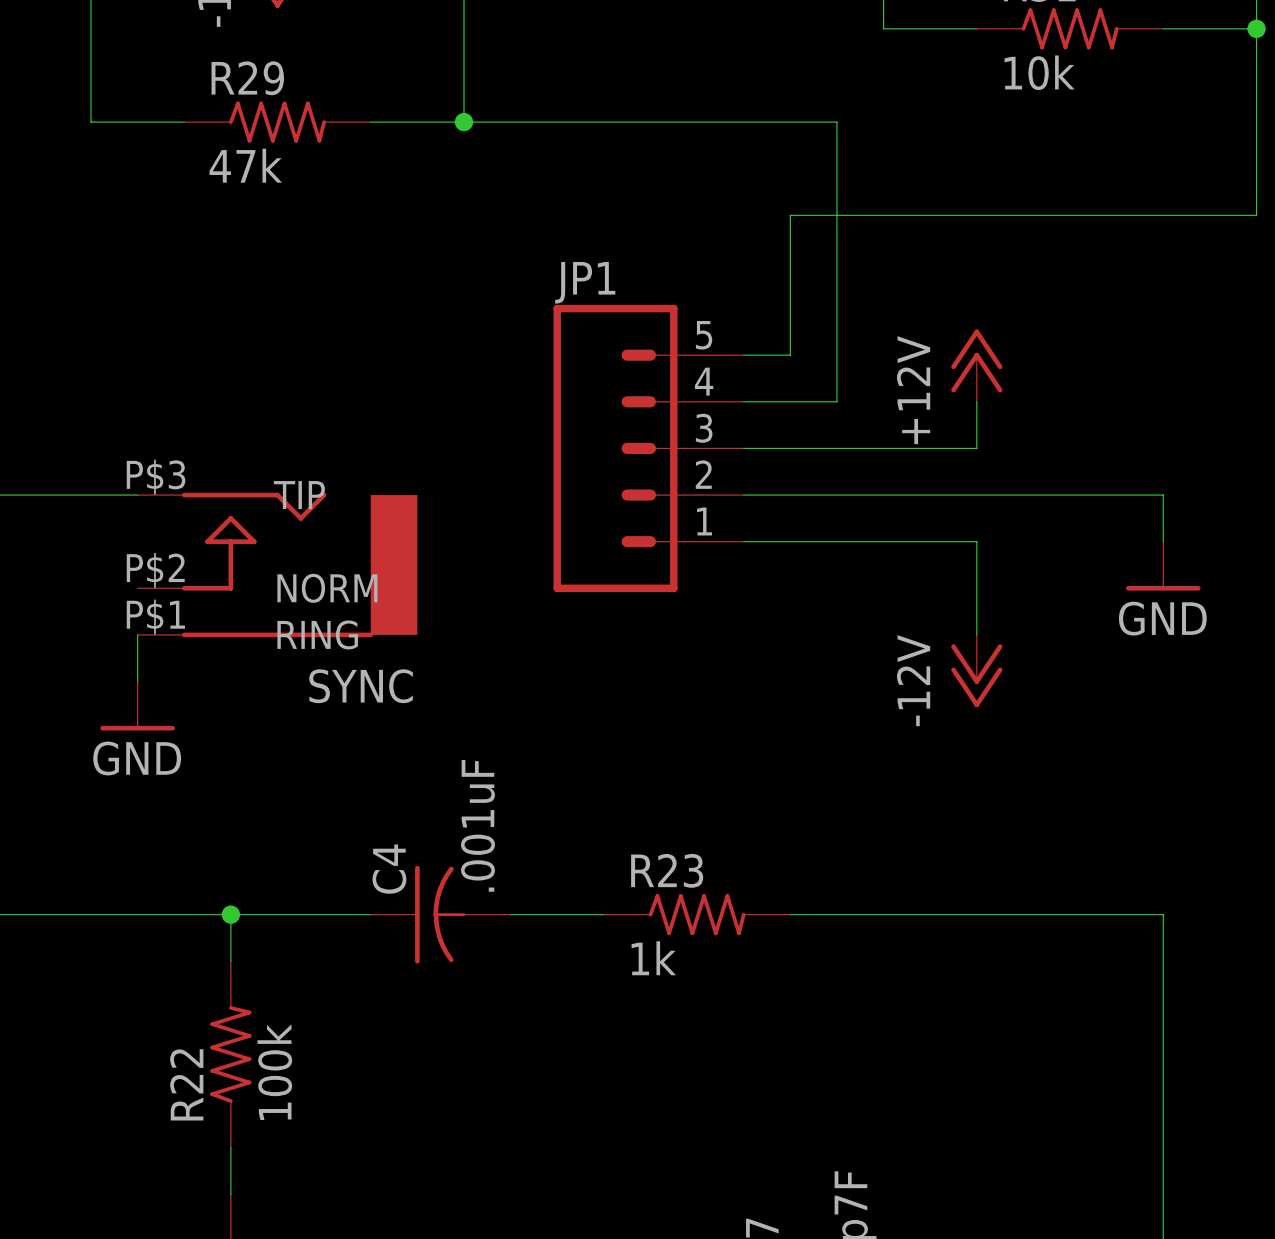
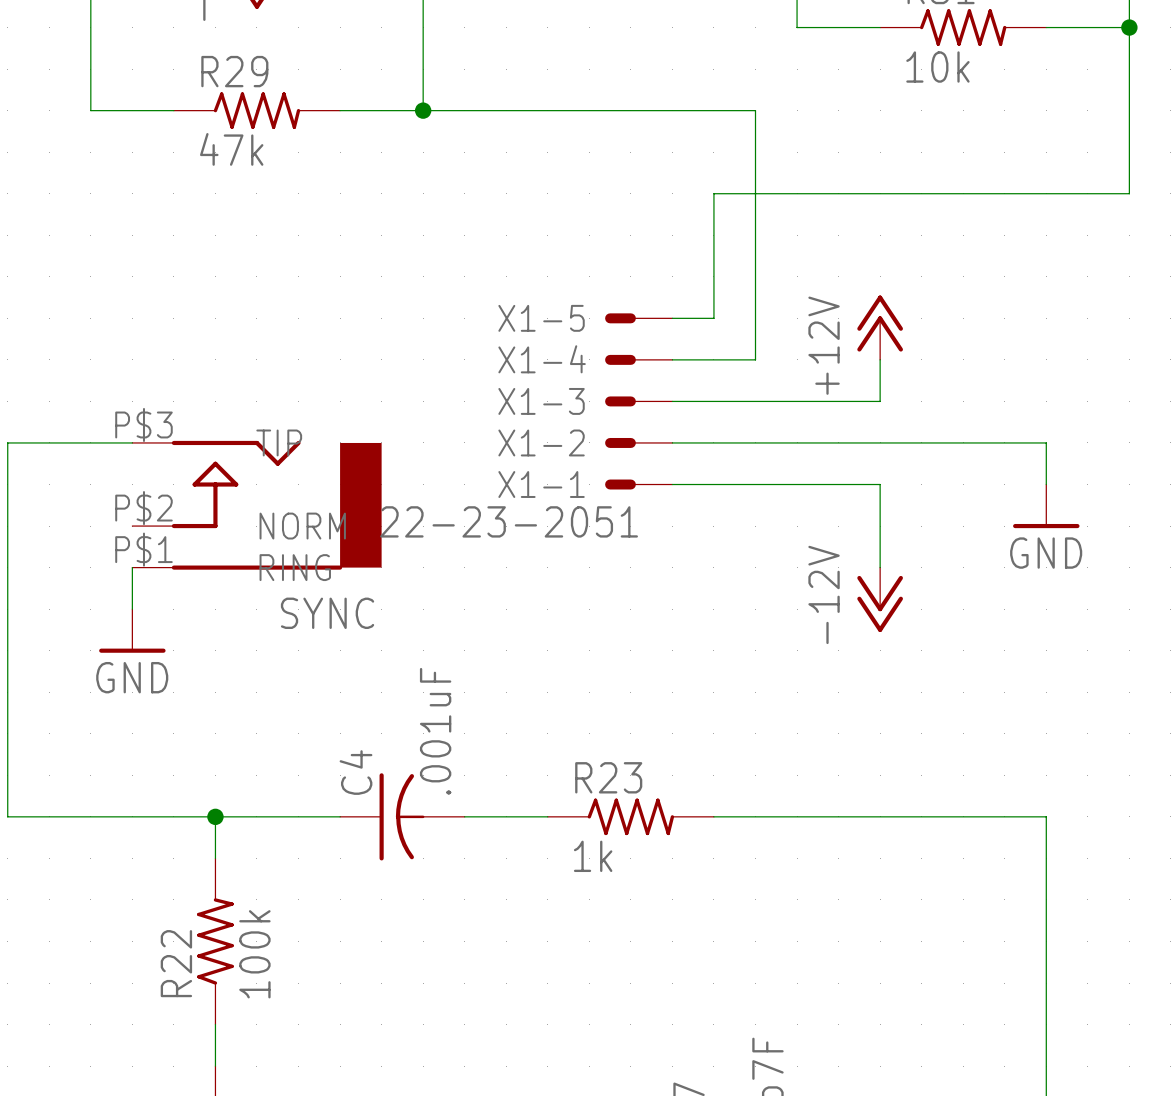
X1-5: none -> (638, 318)
X1-4: none -> (638, 359)
JP1: (648, 448) -> none
X1-3: none -> (638, 401)
X1-2: none -> (638, 442)
X1-1: none -> 22-23-2051 (638, 484)

